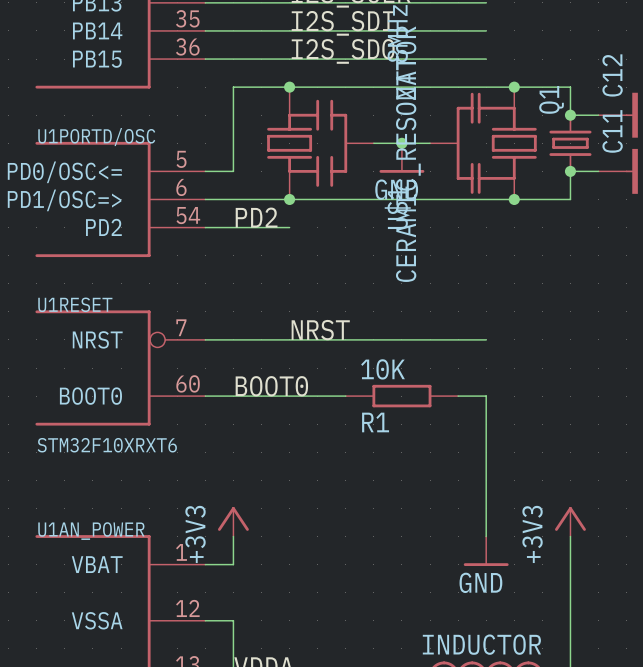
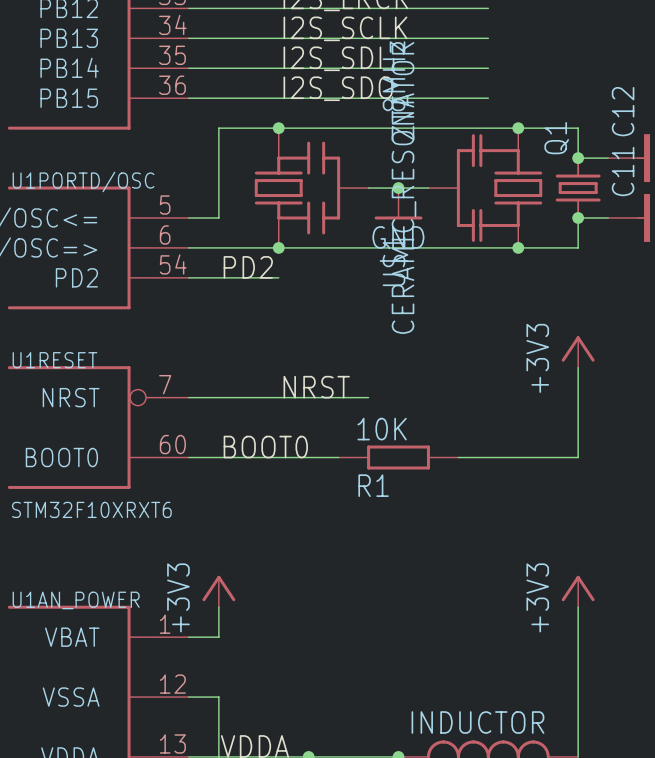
power symbol: none -> +3V3 (578, 351)
wire: (373, 339) (486, 339) -> none
wire: (486, 396) (486, 536) -> (488, 457) (578, 457) (578, 367)
power symbol: GND (486, 551) -> none

